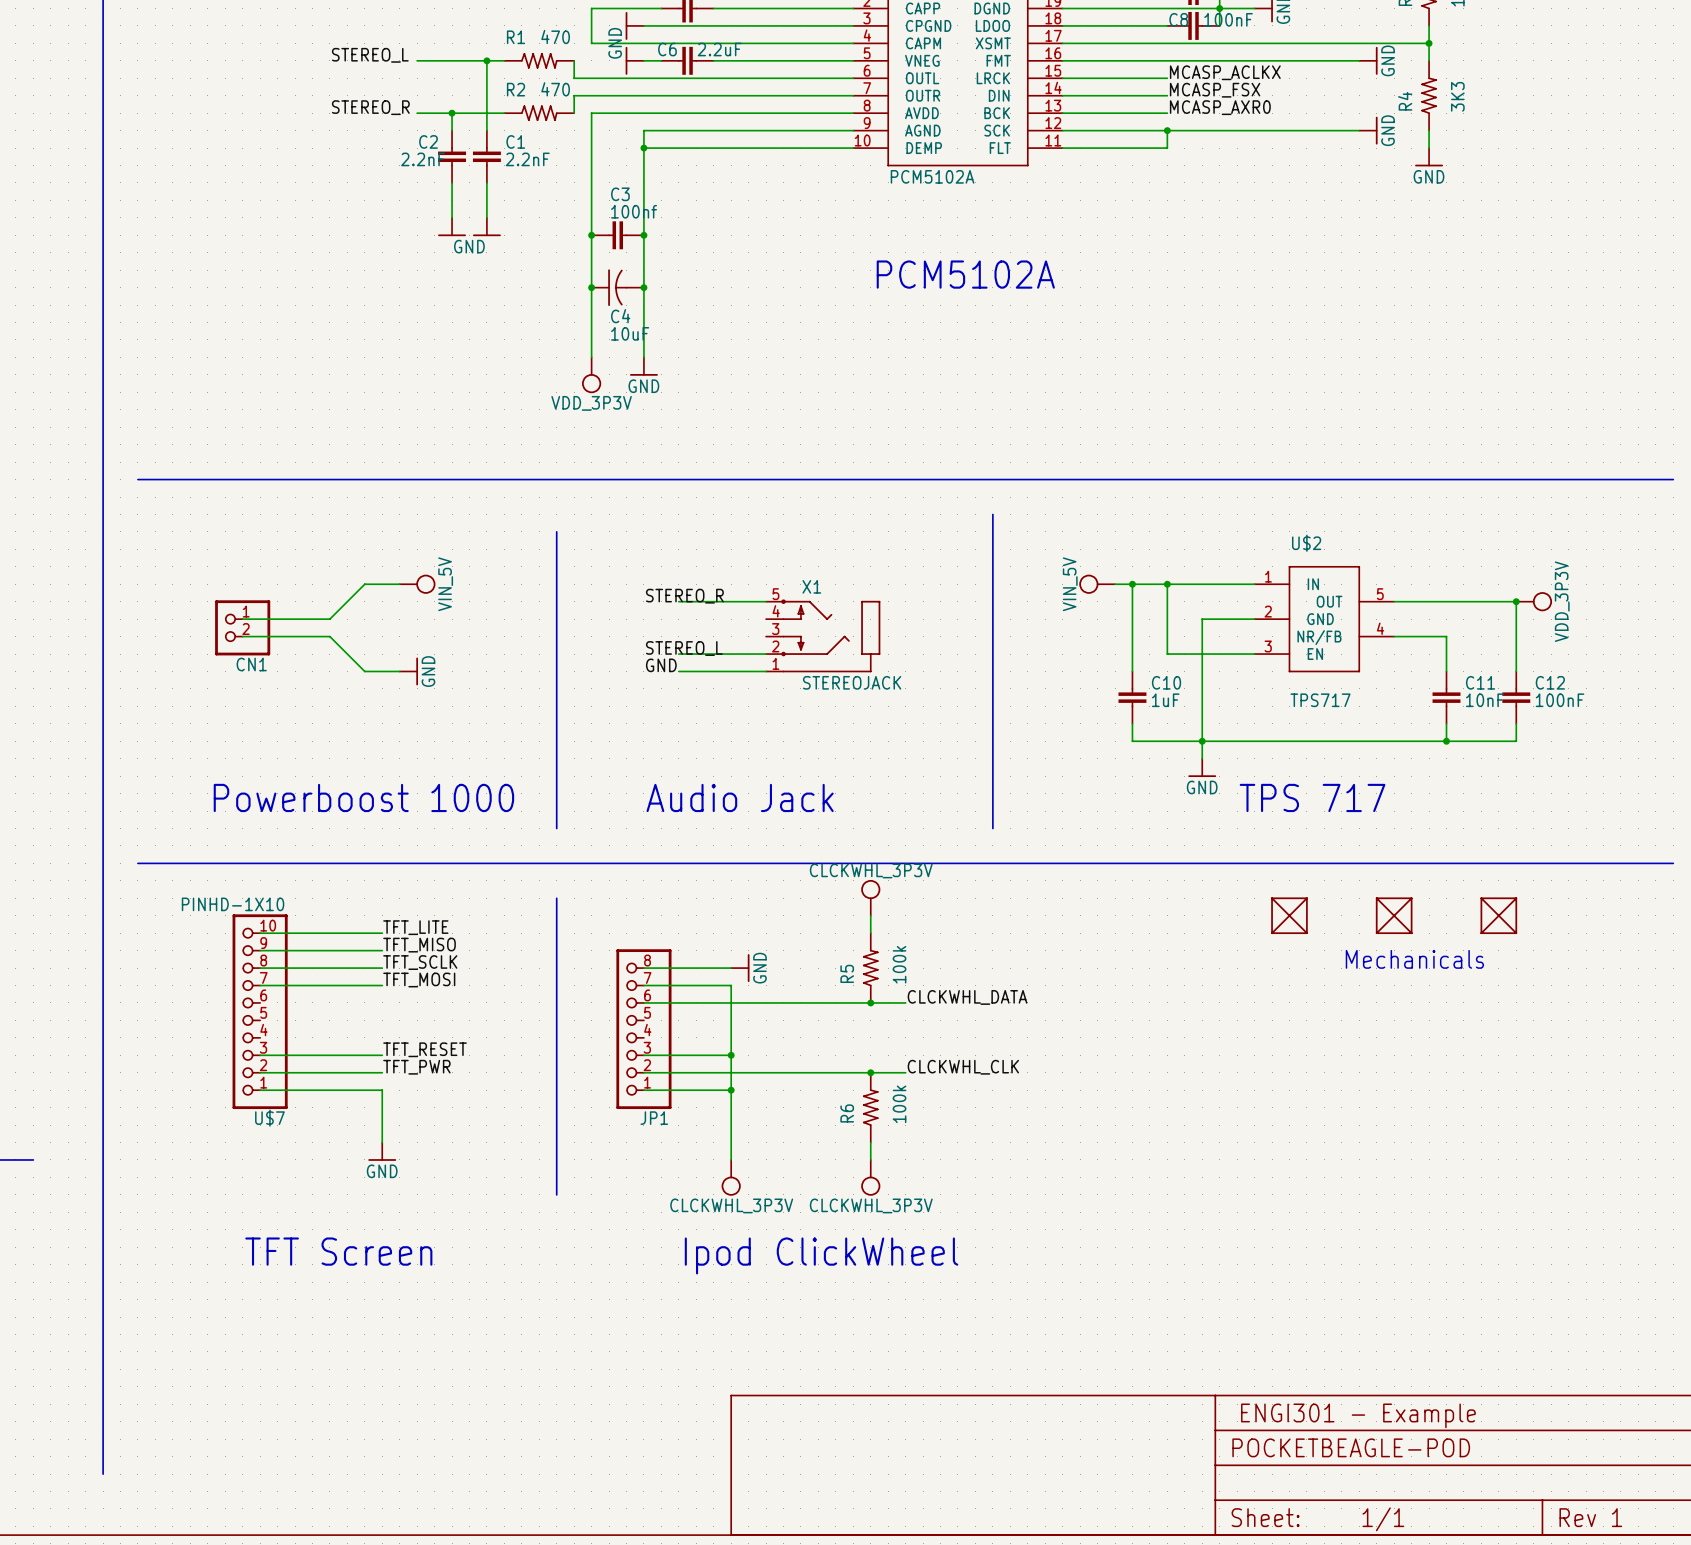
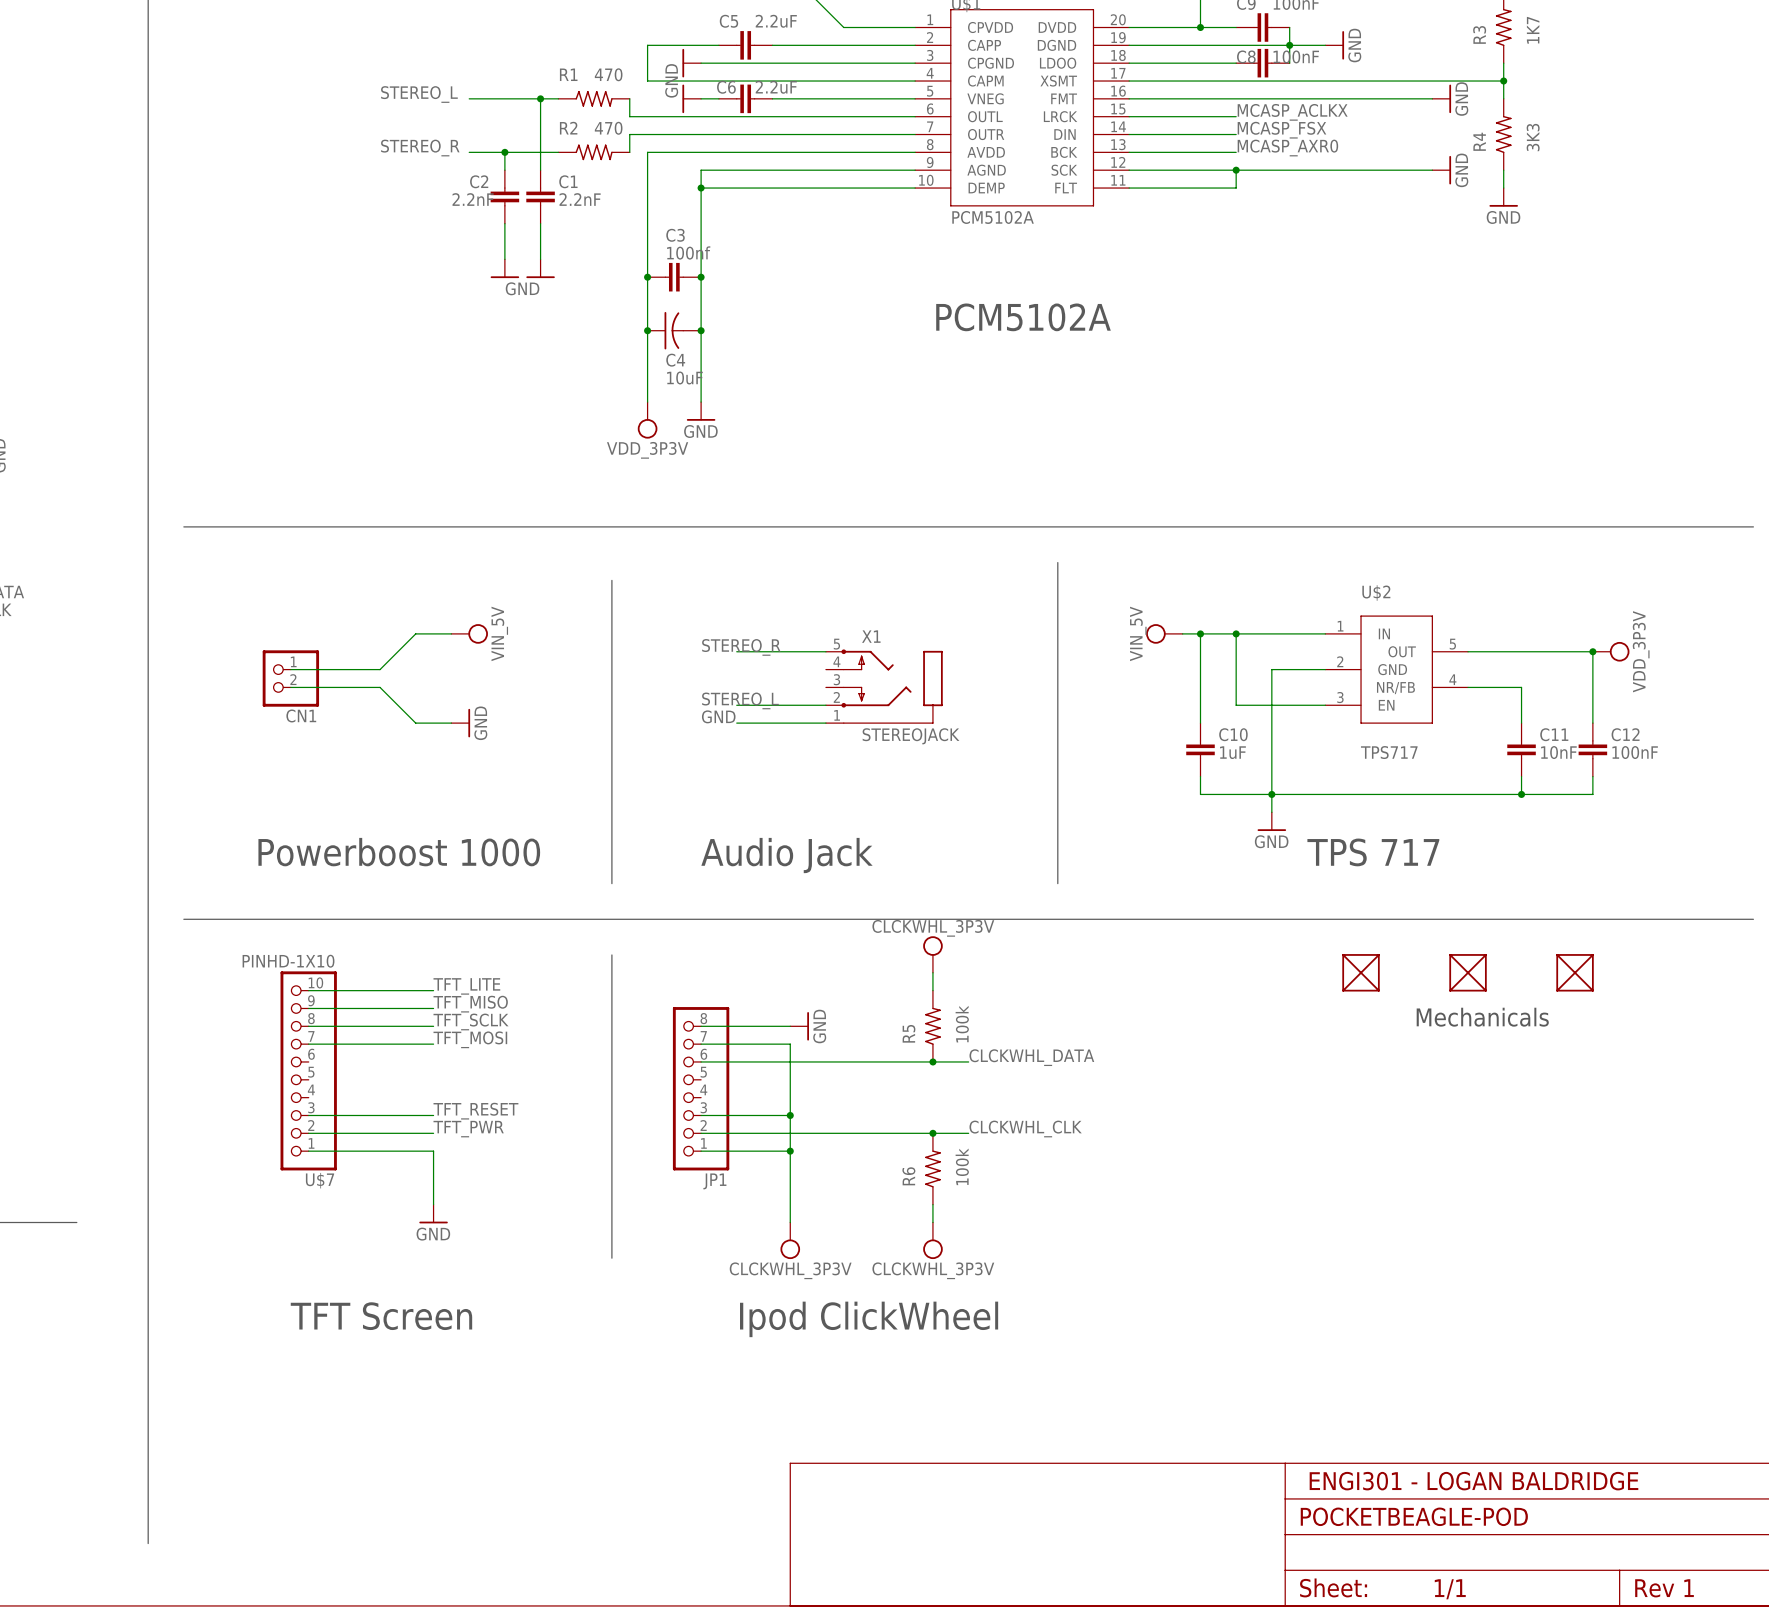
text: ENGI301 - Example (1358, 1415) -> ENGI301 - LOGAN BALDRIDGE (1473, 1481)

